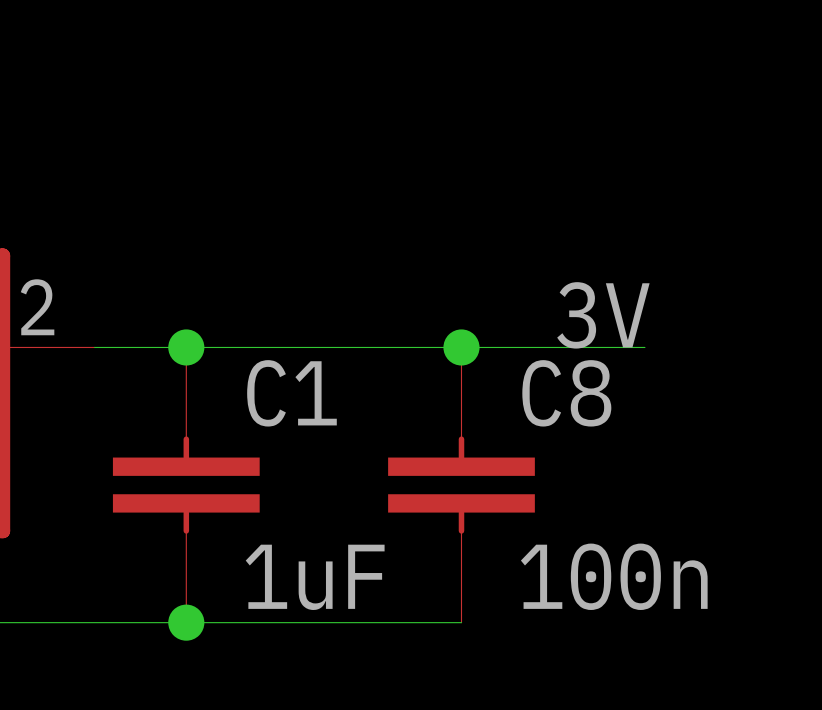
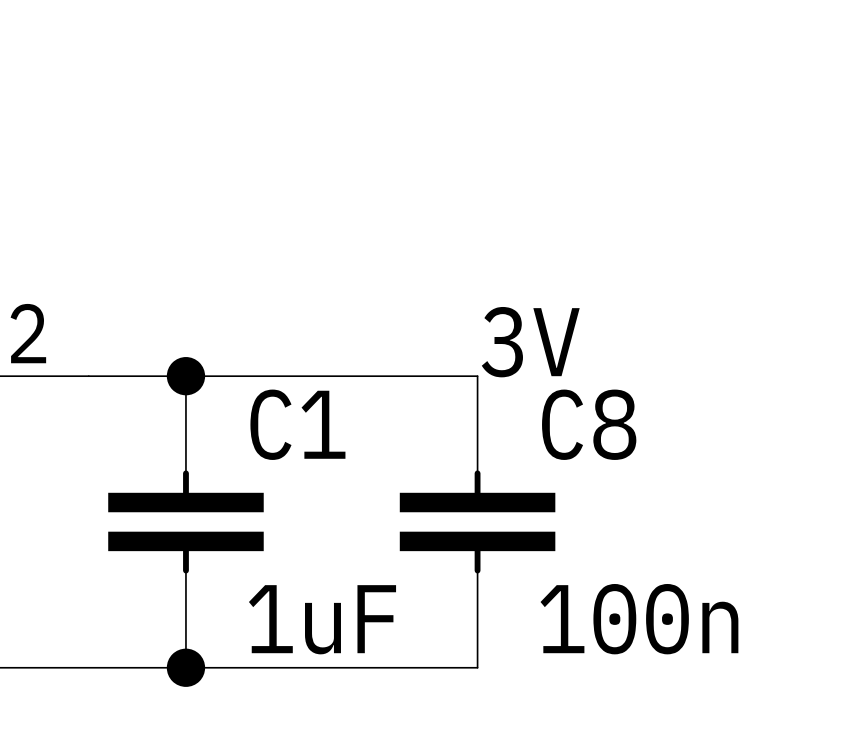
label position: 3V (603, 315) -> 3V (530, 342)
wire: (461, 347) (644, 347) -> none
junction: (461, 347) -> none

